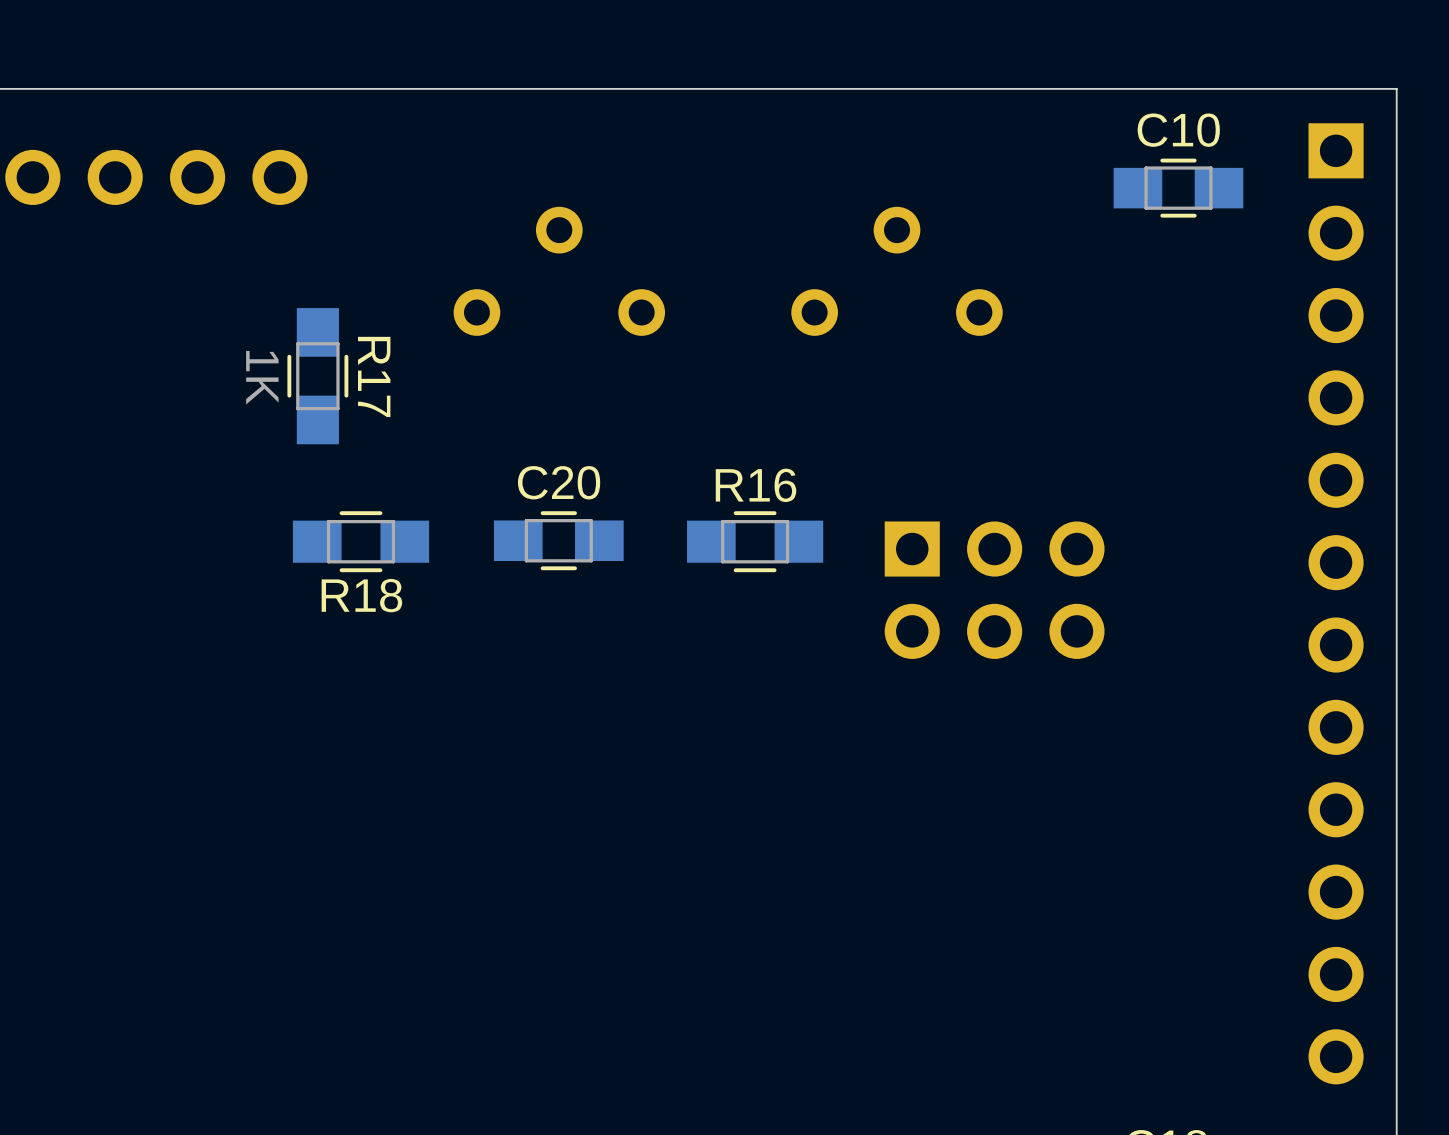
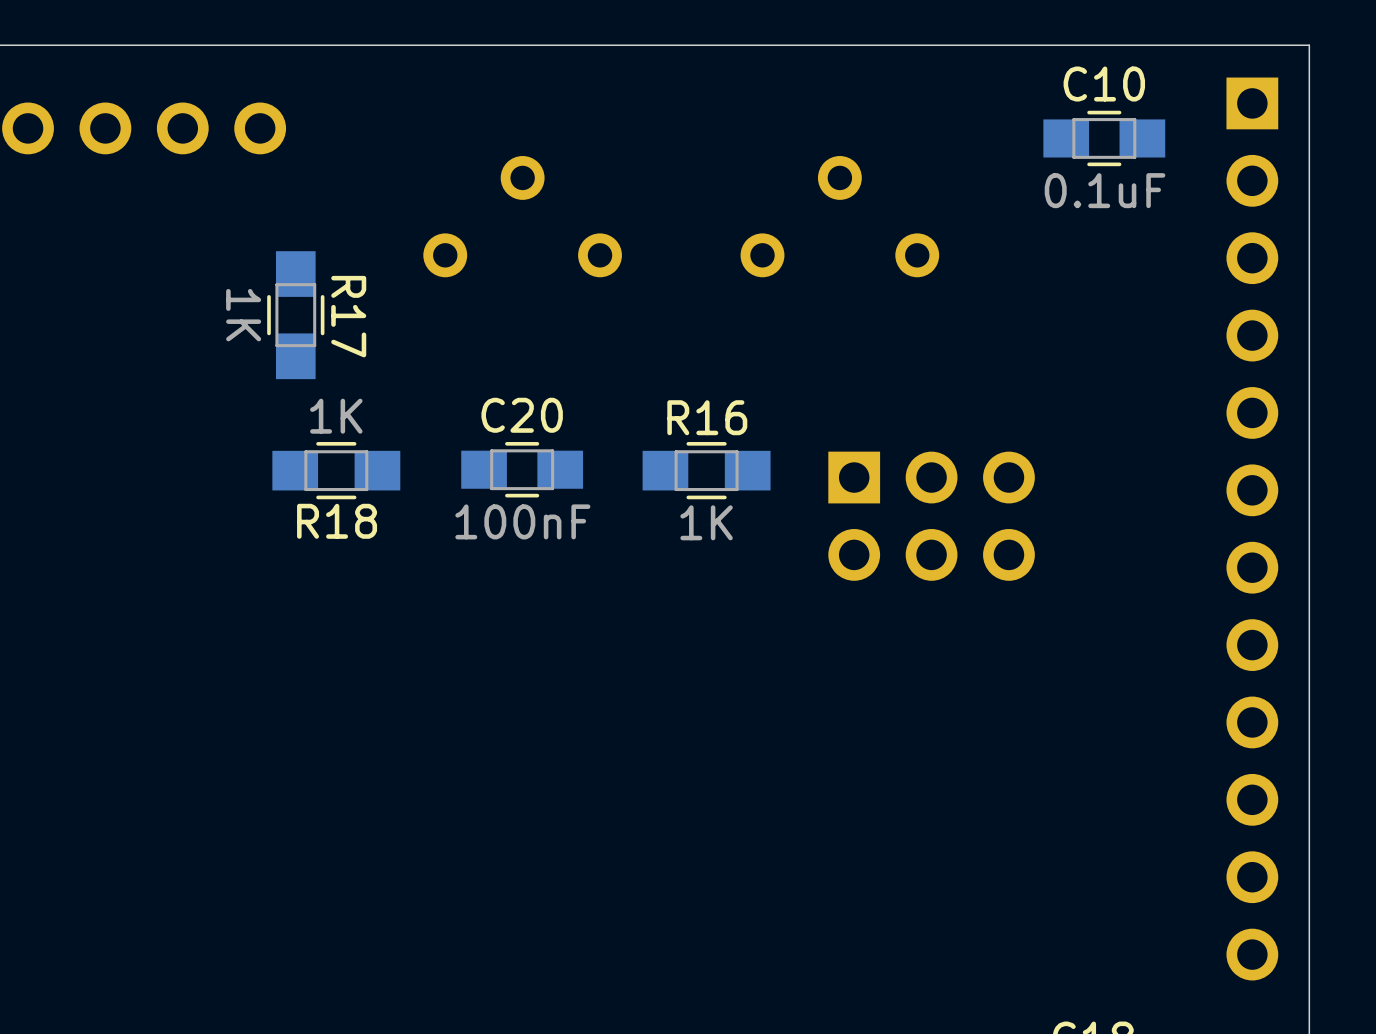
C10 value: none -> 0.1uF (1105, 190)
R18 value: none -> 1K (336, 416)
C20 value: none -> 100nF (522, 521)
R16 value: none -> 1K (706, 522)

